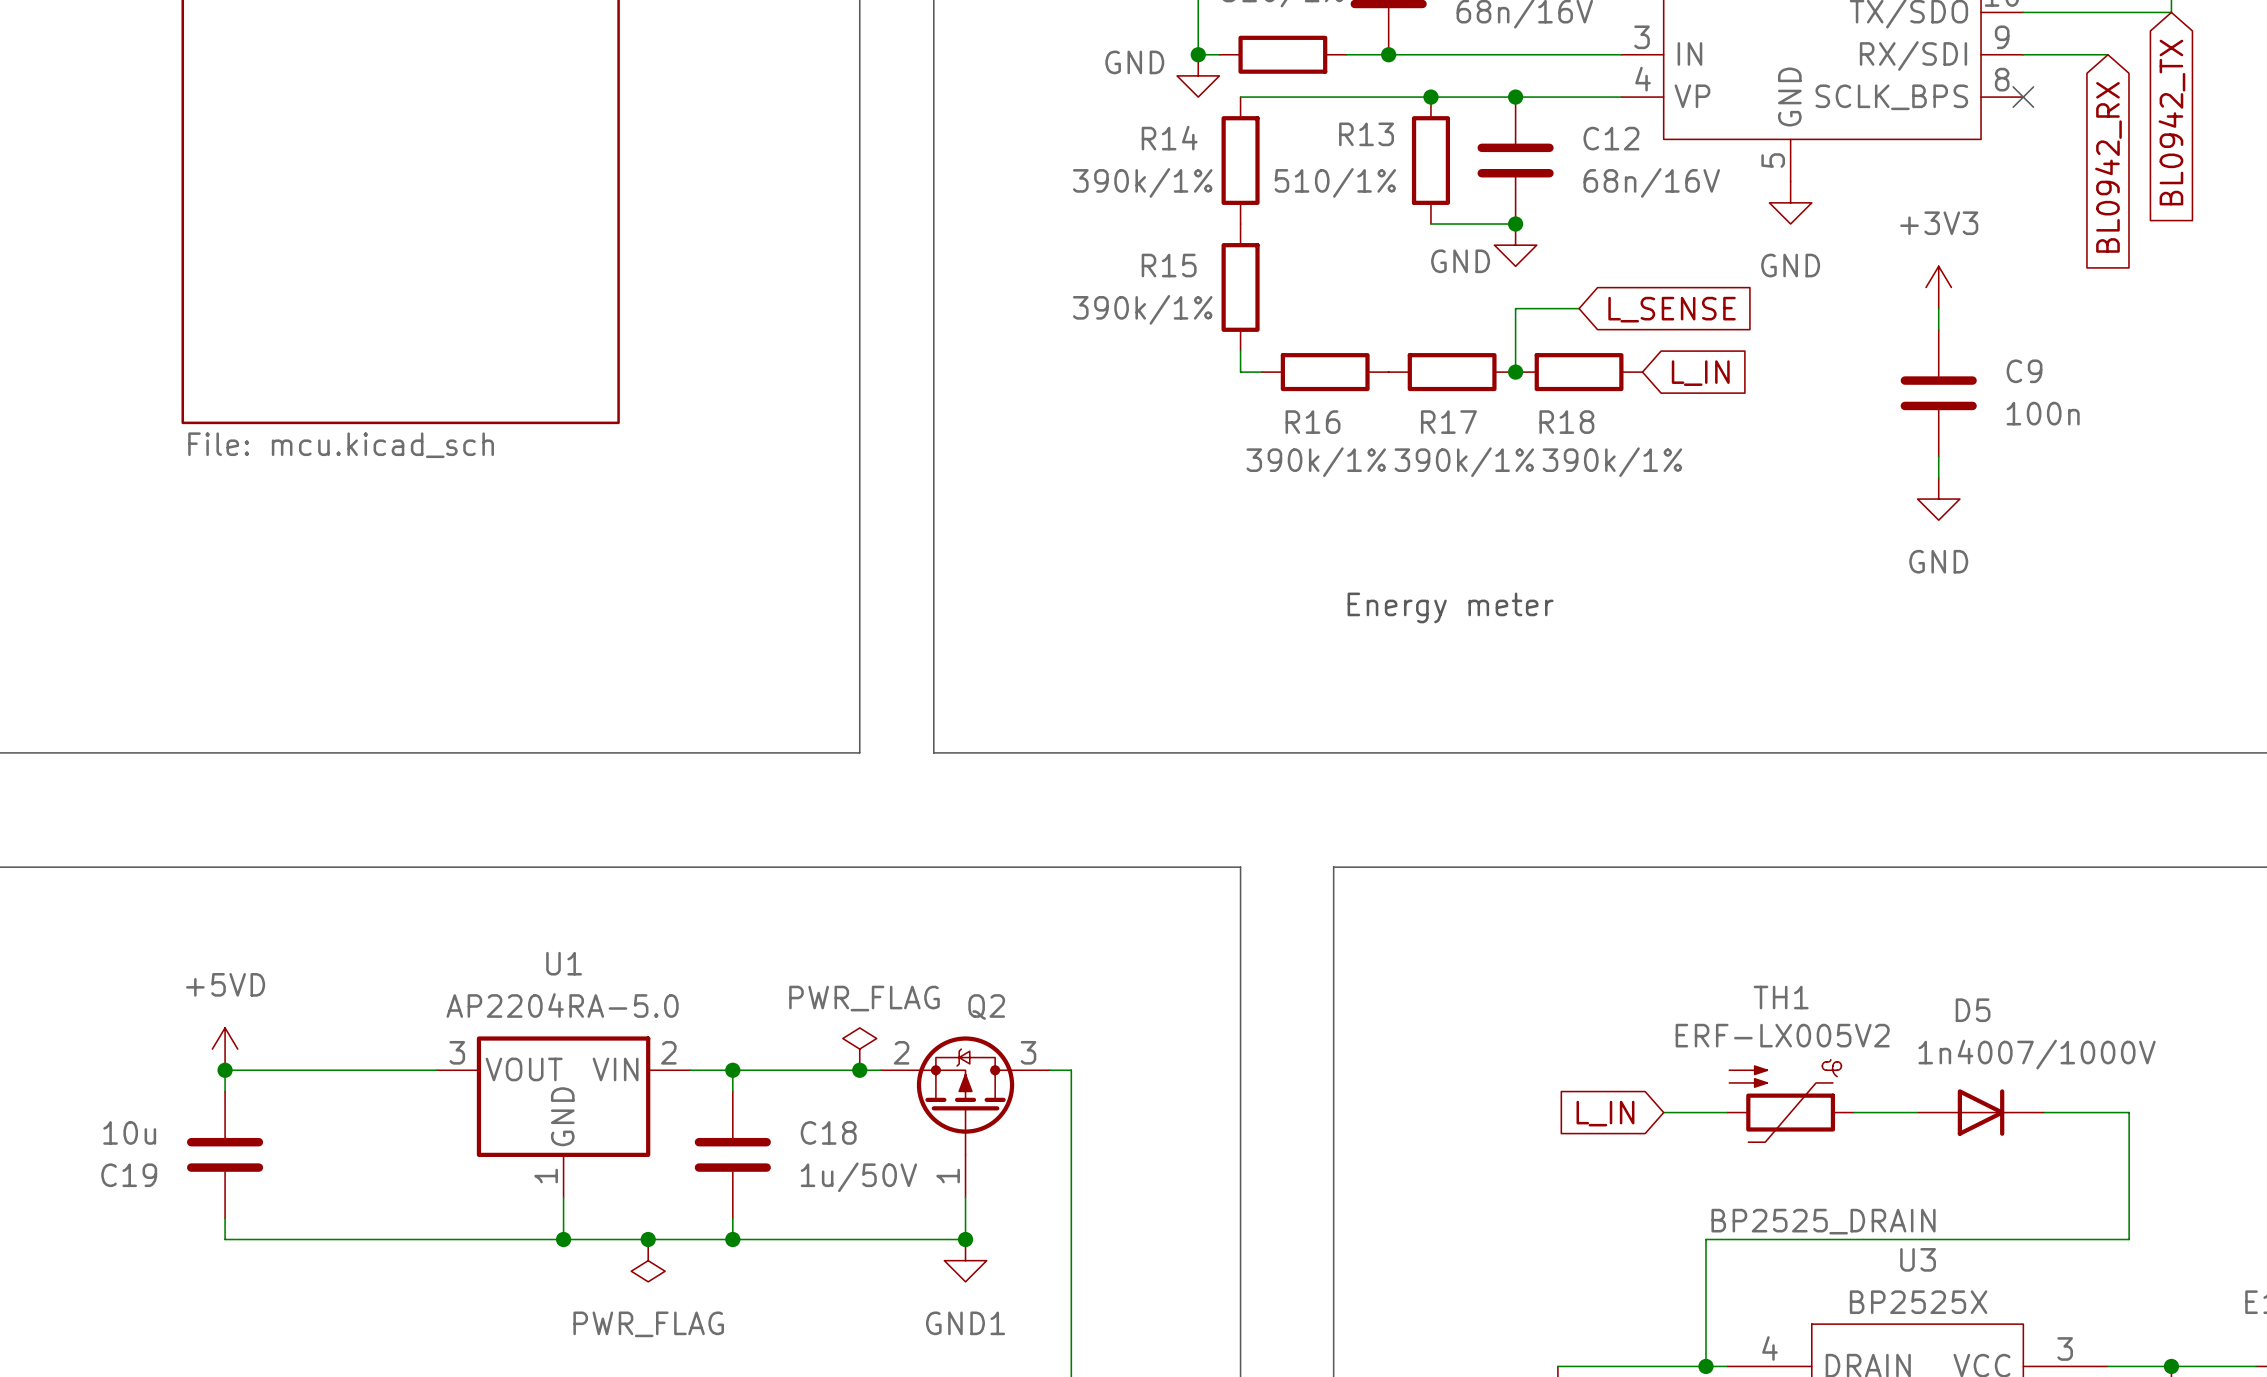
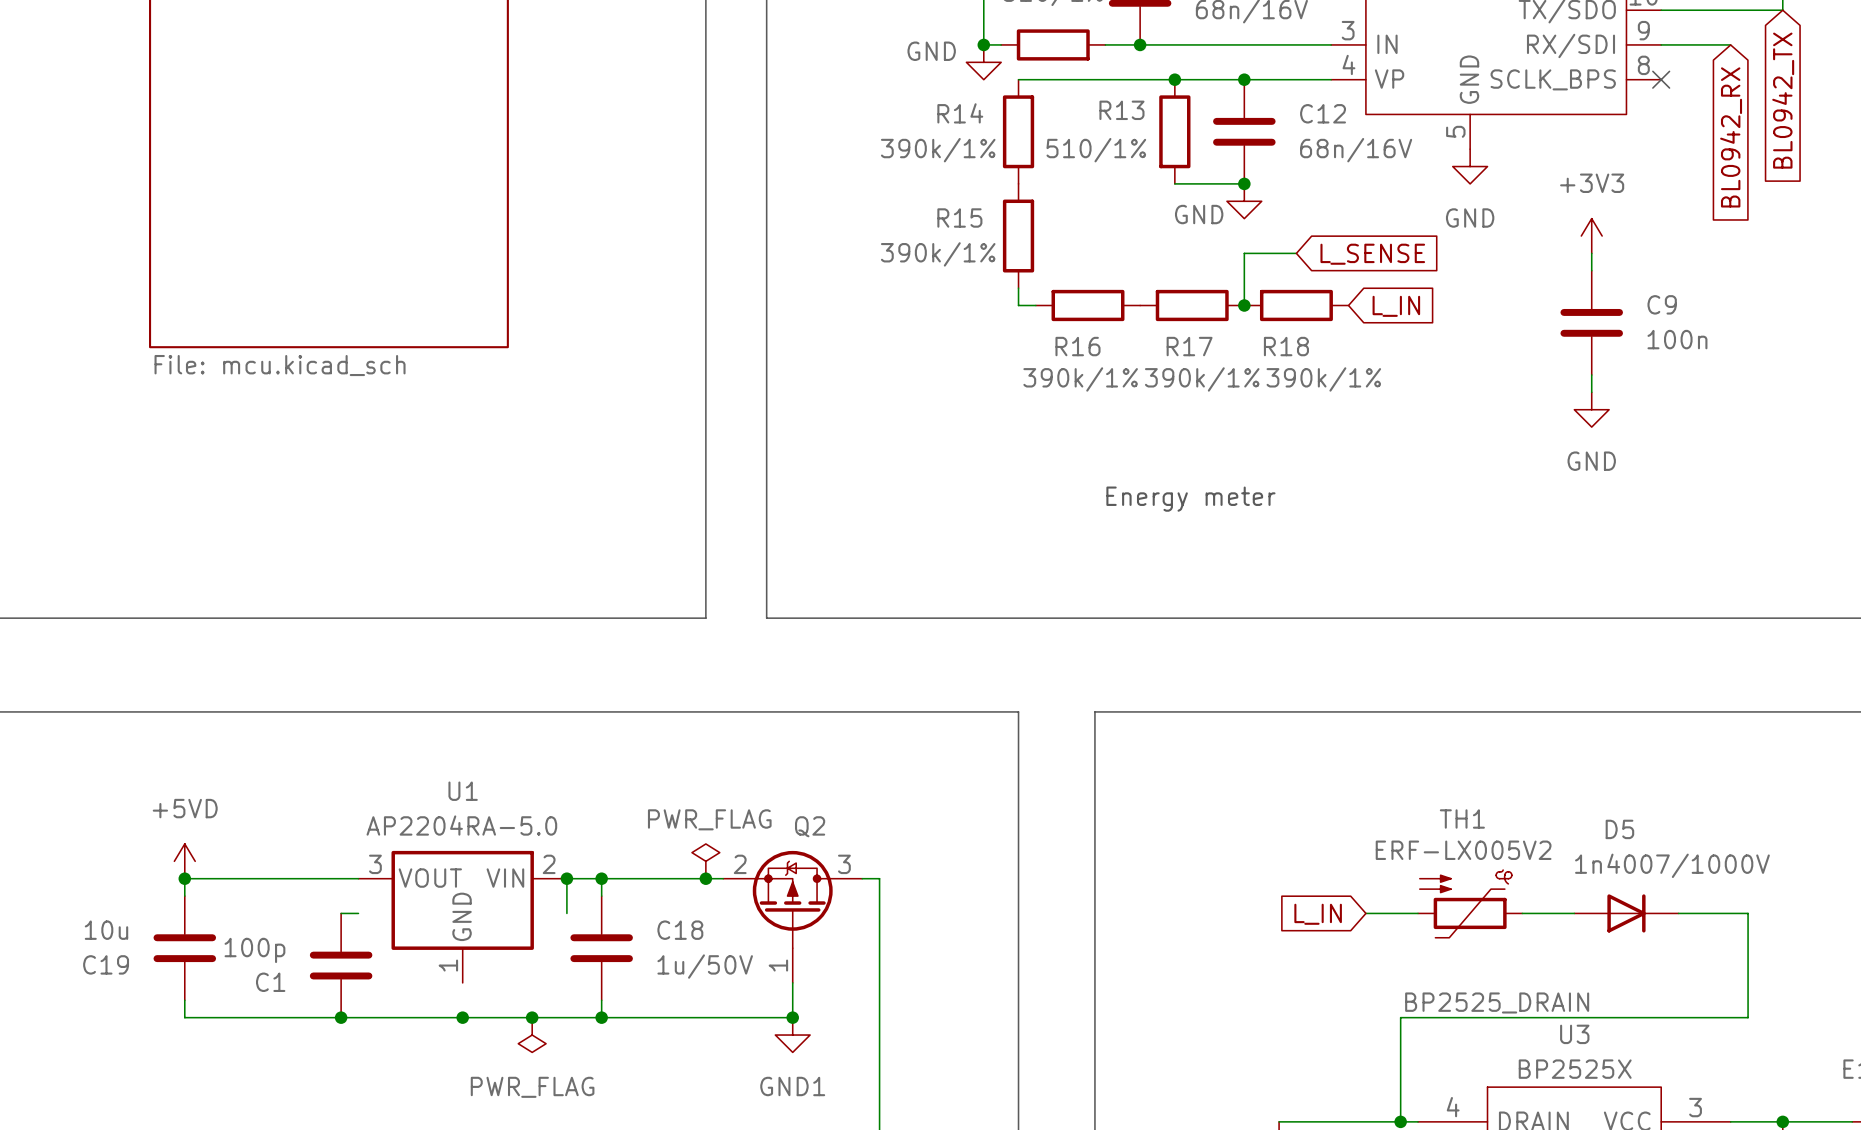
junction: none -> (566, 878)
wire: none -> (341, 913) (358, 913)
C1: none -> 100p (341, 965)
wire: (563, 1197) (563, 1239) -> (566, 878) (566, 913)
junction: none -> (341, 1017)

